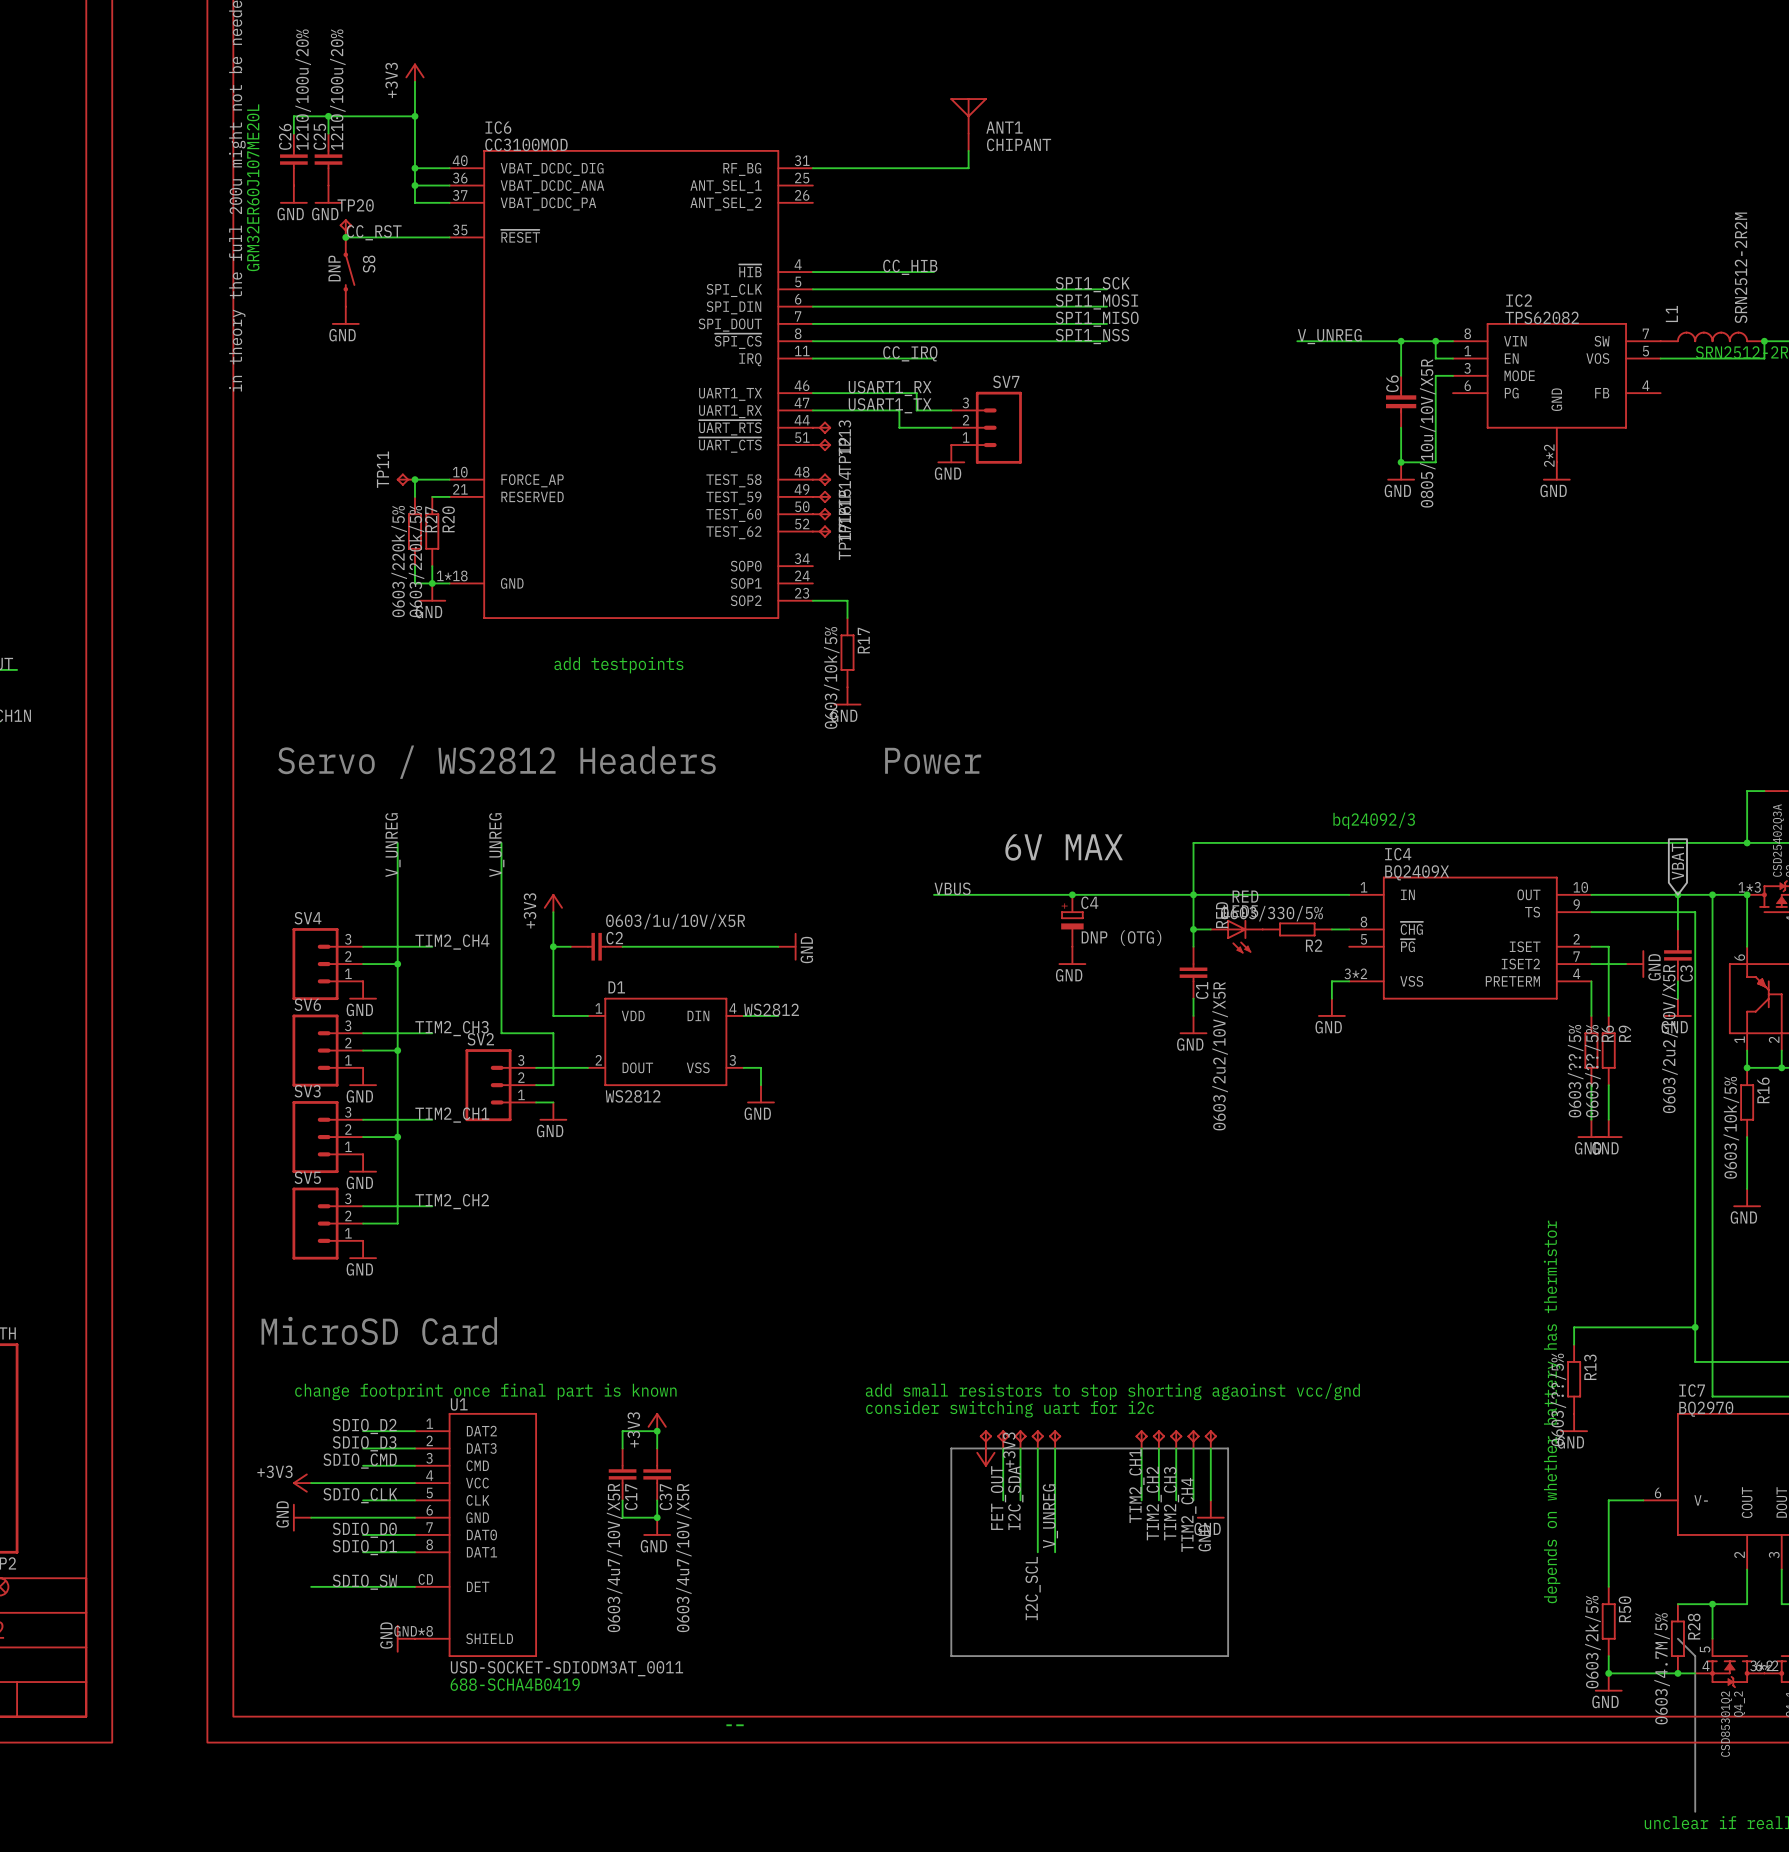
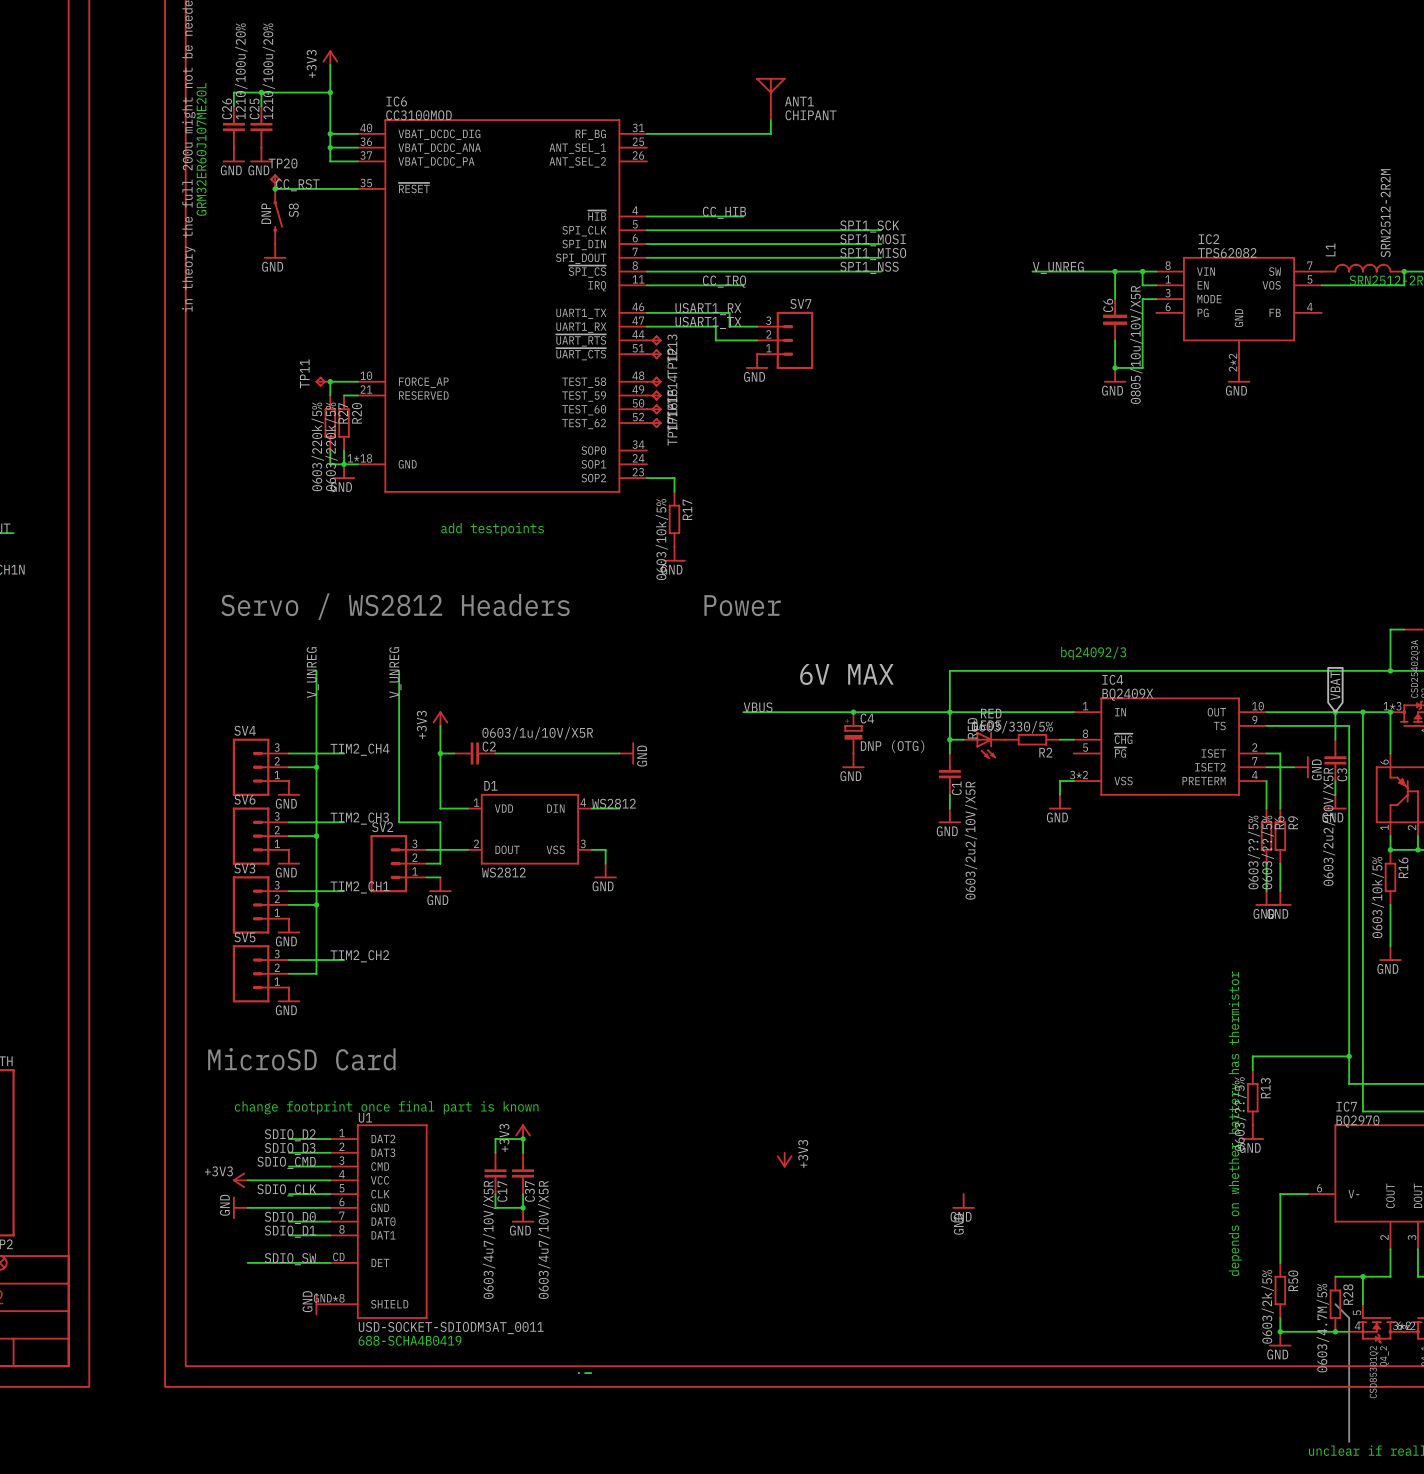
text: add small resistors to stop shorting agaoinst vcc/gnd (1112, 1391) -> none
text: consider switching uart for i2c (1010, 1409) -> none
part: (985, 1439) -> none
part: (1003, 1439) -> none
part: (1020, 1439) -> none
part: (1037, 1439) -> none
part: (1055, 1439) -> none
part: (1141, 1439) -> none
part: (1158, 1439) -> none
part: (1176, 1439) -> none
part: (1193, 1439) -> none
part: (1210, 1439) -> none
line: (951, 1448) (1228, 1448) (1228, 1656) (951, 1656) (951, 1448) -> none
wire: (1003, 1448) (1003, 1500) -> none
wire: (1020, 1448) (1020, 1500) -> none
wire: (1037, 1448) (1037, 1552) -> none
wire: (1055, 1448) (1055, 1552) -> none
wire: (1141, 1448) (1141, 1500) -> none
wire: (1158, 1448) (1158, 1500) -> none
wire: (1176, 1448) (1176, 1500) -> none
wire: (1193, 1448) (1193, 1500) -> none
wire: (1210, 1448) (1210, 1500) -> none
label: TIM2_CH1 (1136, 1486) -> none
label: FET_OUT (998, 1498) -> none
label: I2C_SDA (1015, 1498) -> none
label: TIM2_CH2 (1154, 1503) -> none
label: TIM2_CH3 (1171, 1503) -> none
label: TIM2_CH4 (1188, 1514) -> none
label: V_UNREG (1050, 1516) -> none
label: I2C_SCL (1033, 1588) -> none

